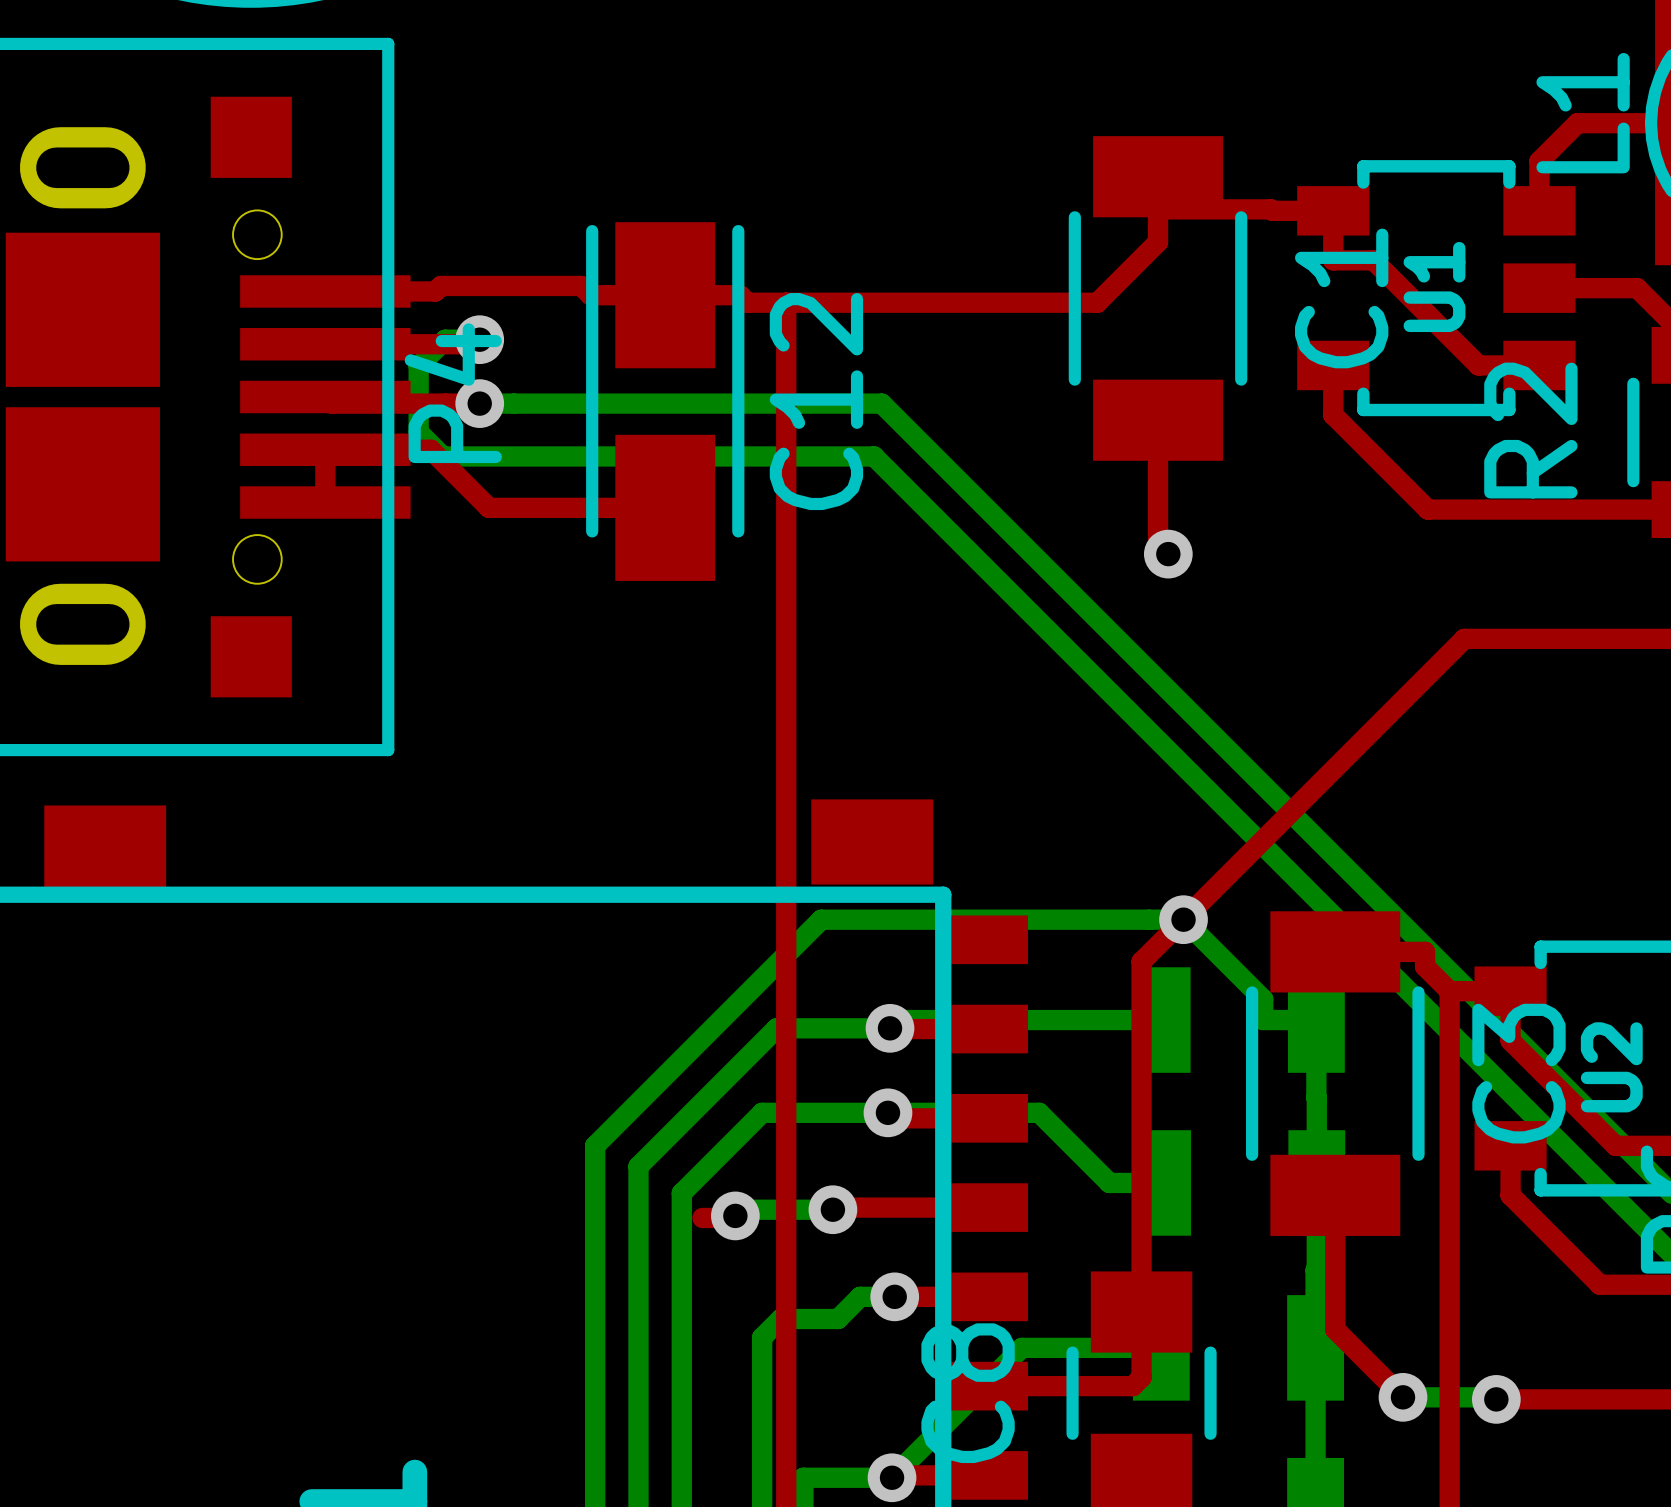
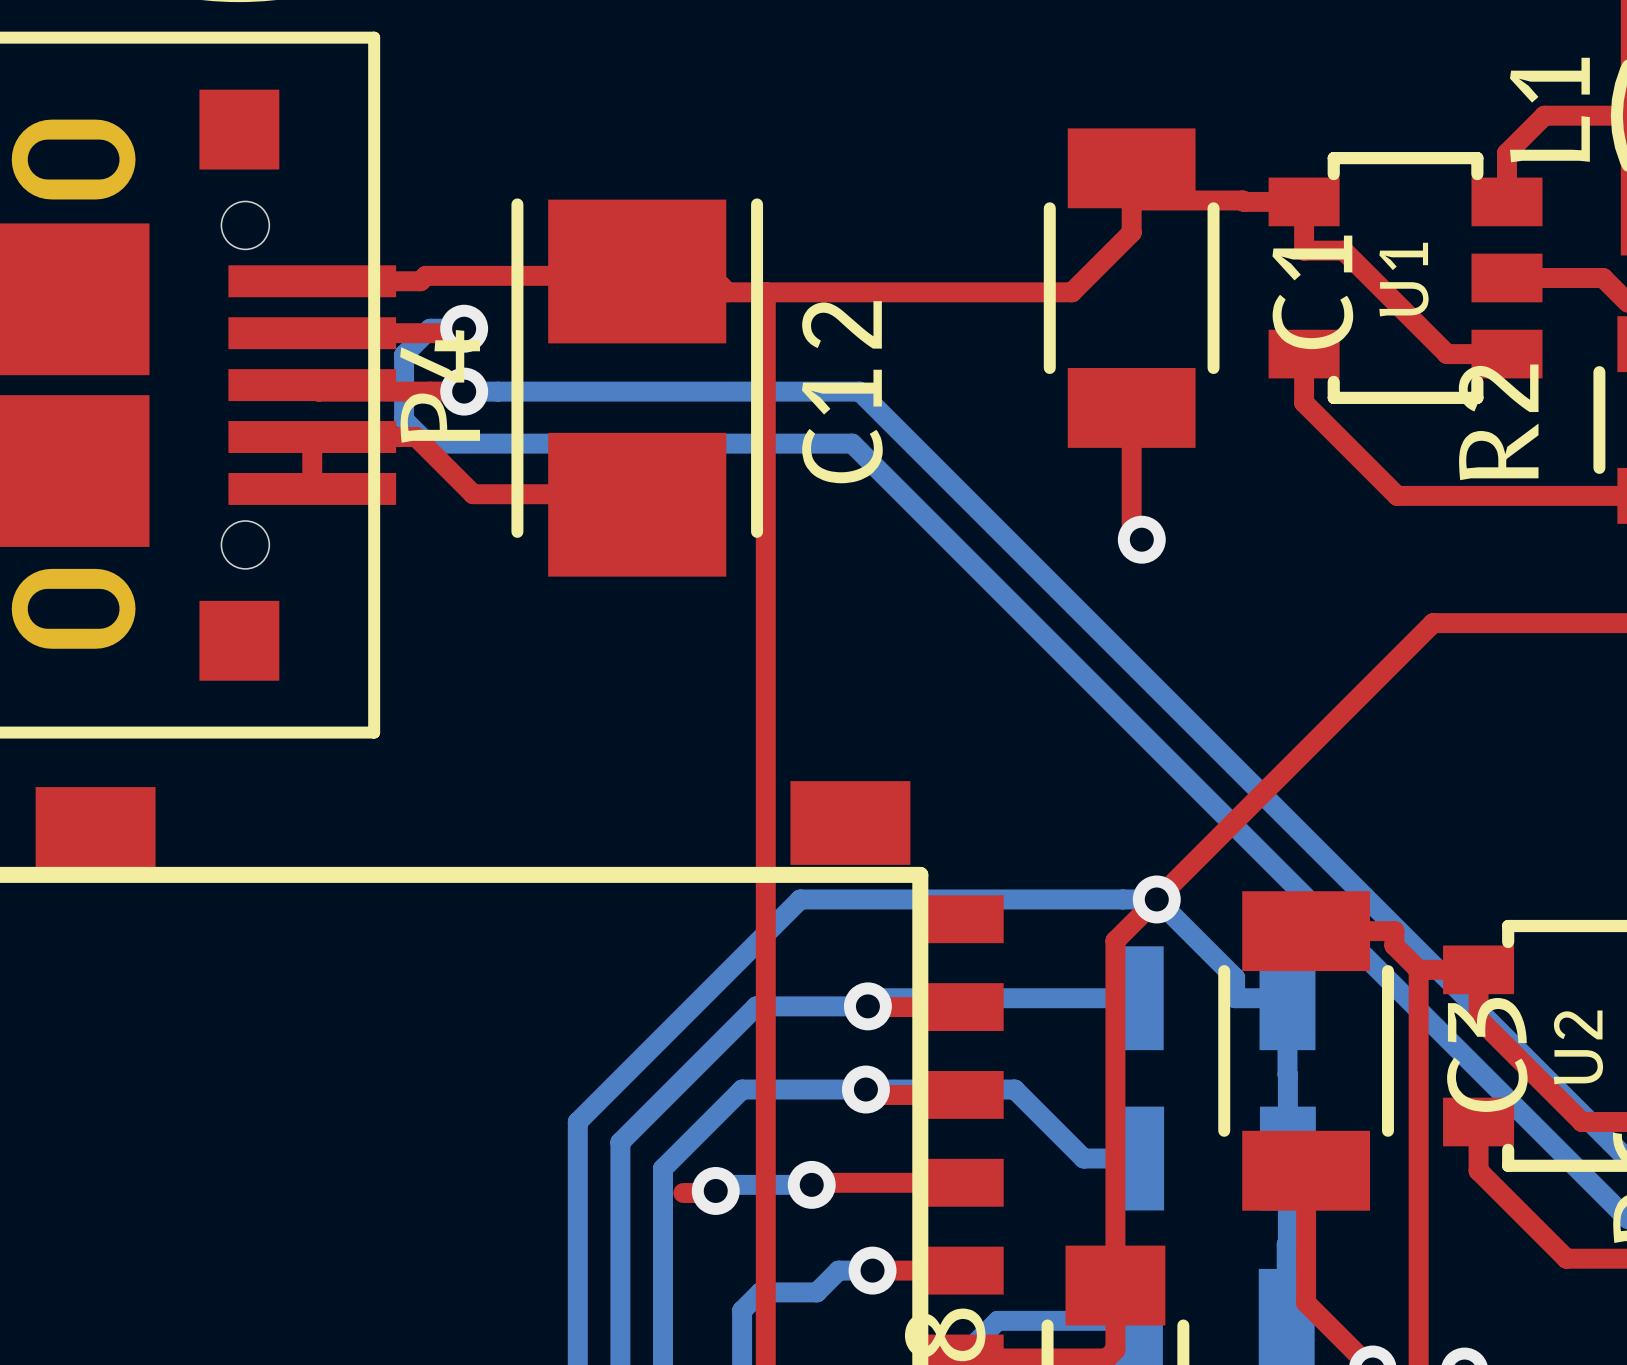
C12 footprint: [586, 222, 745, 581] -> [511, 198, 764, 577]
C12 name position: C12 (816, 401) -> C12 (842, 392)

